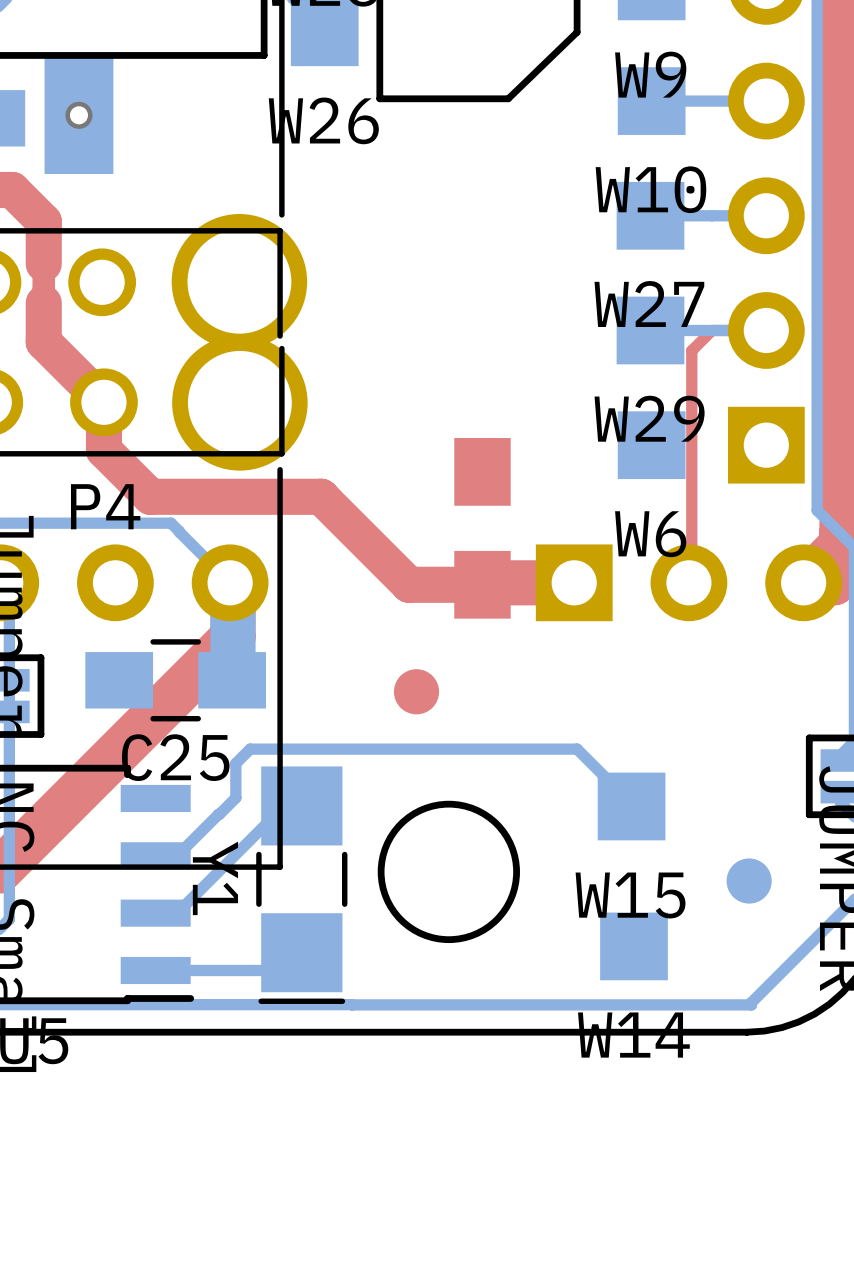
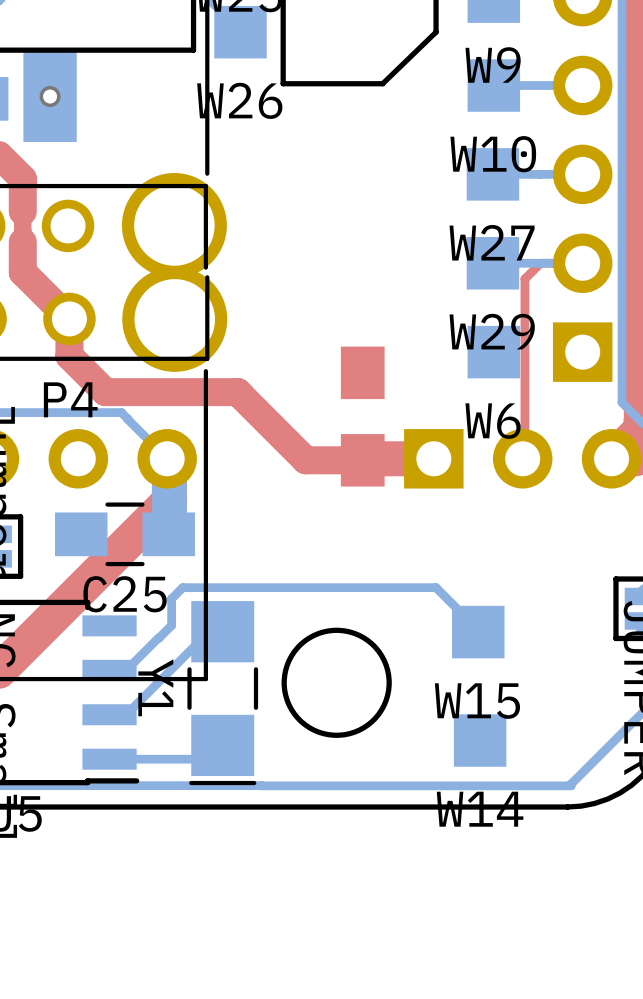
part: (416, 691) -> none
part: (749, 881) -> none

